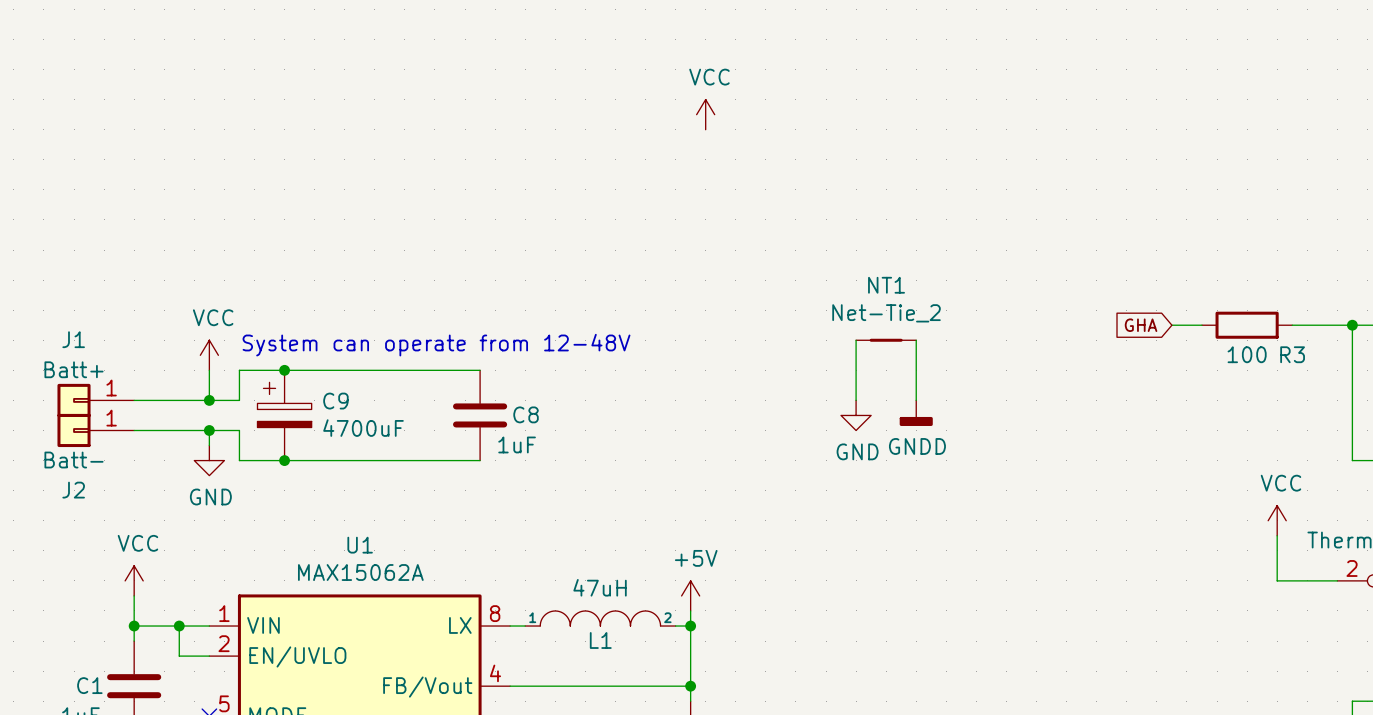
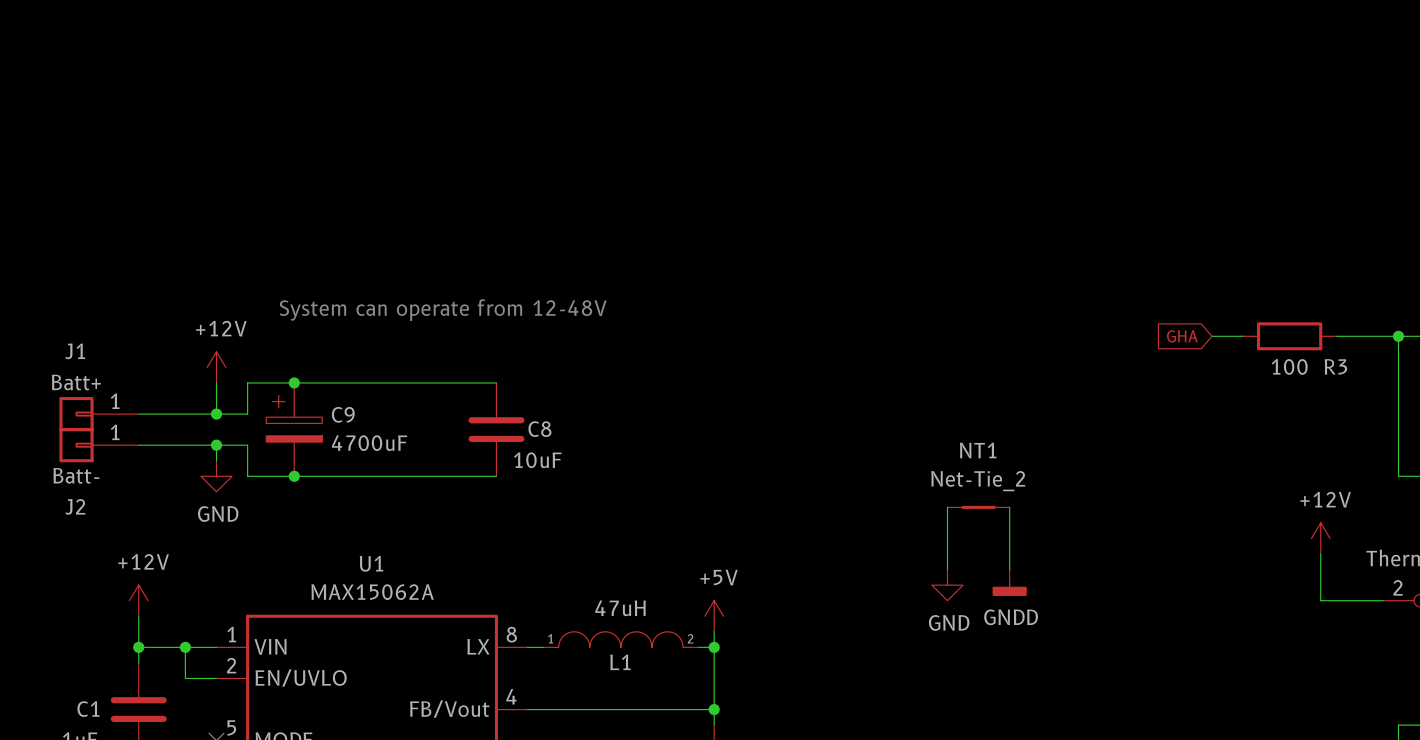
power symbol: VCC (705, 114) -> none
wire: (856, 340) (856, 400) -> (1009, 507) (1009, 569)
NT1 position: (886, 340) -> (978, 507)
wire: (916, 340) (916, 400) -> (947, 507) (947, 569)
text position: System can operate from 12-48V (436, 345) -> System can operate from 12-48V (443, 310)
power symbol: VCC (209, 355) -> +12V (216, 367)
power symbol position: GNDD (916, 413) -> GNDD (1009, 582)
power symbol position: GND (856, 415) -> GND (947, 585)
C8 value: 1uF (517, 444) -> 10uF (537, 460)
power symbol: VCC (1277, 520) -> +12V (1320, 538)
power symbol: VCC (134, 580) -> +12V (138, 600)

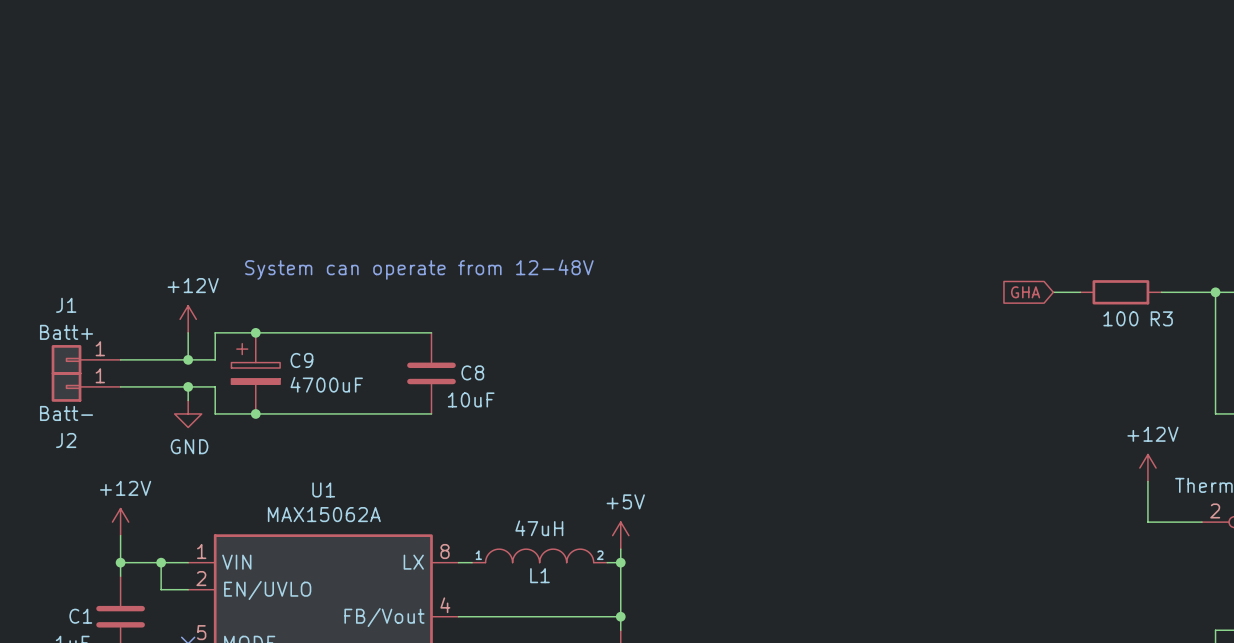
wire: (947, 507) (947, 569) -> none
NT1: Net-Tie_2 (978, 507) -> none
wire: (1009, 507) (1009, 569) -> none
power symbol: GNDD (1009, 582) -> none
power symbol: GND (947, 585) -> none

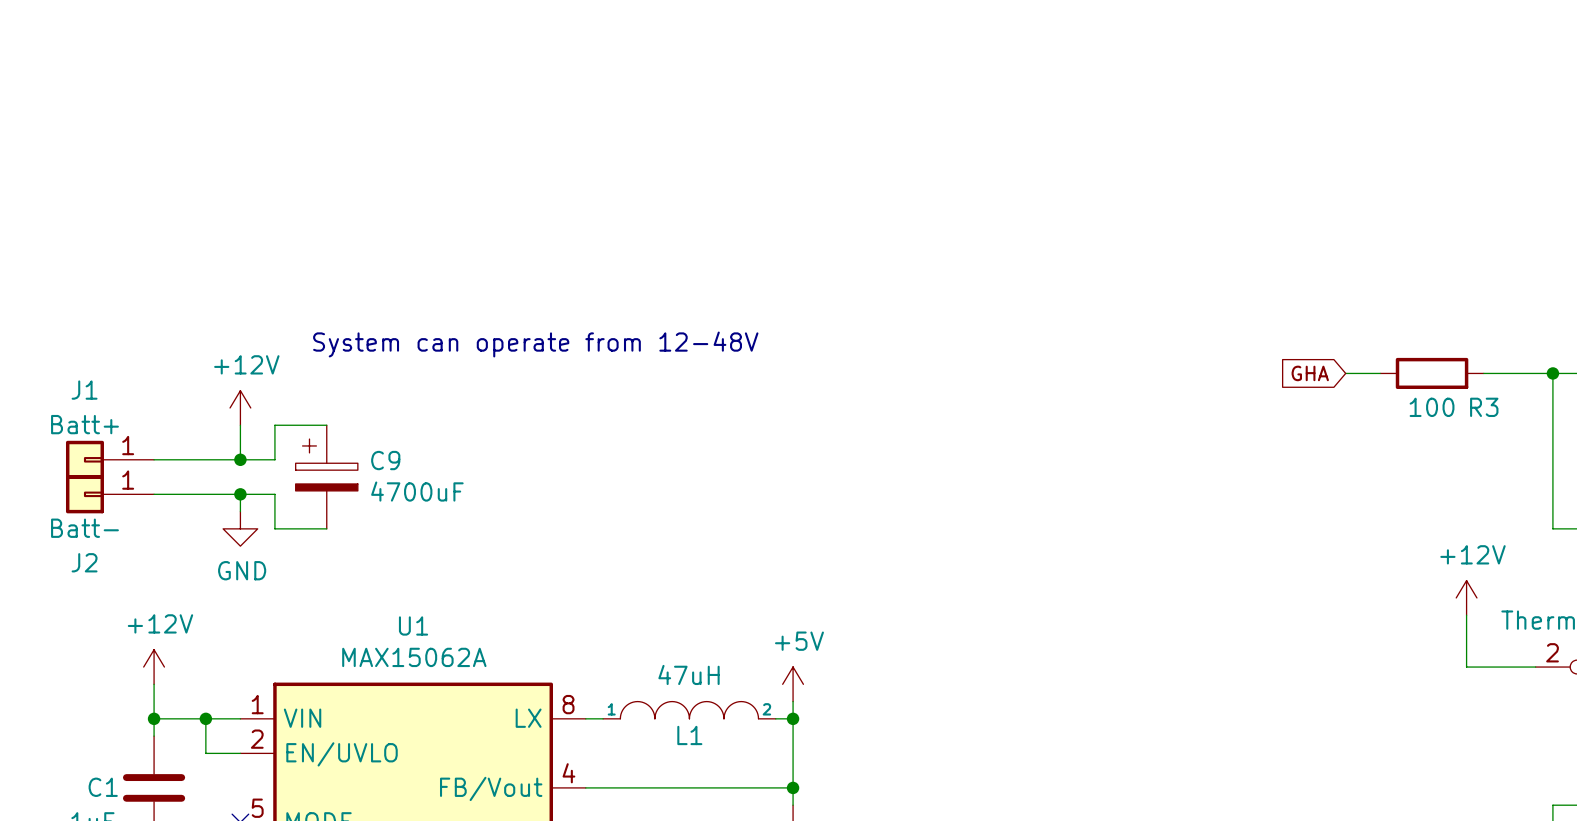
wire: (255, 332) (431, 332) -> none
junction: (255, 332) -> none
C8: 10uF (431, 373) -> none
wire: (255, 413) (431, 413) -> none
junction: (255, 413) -> none

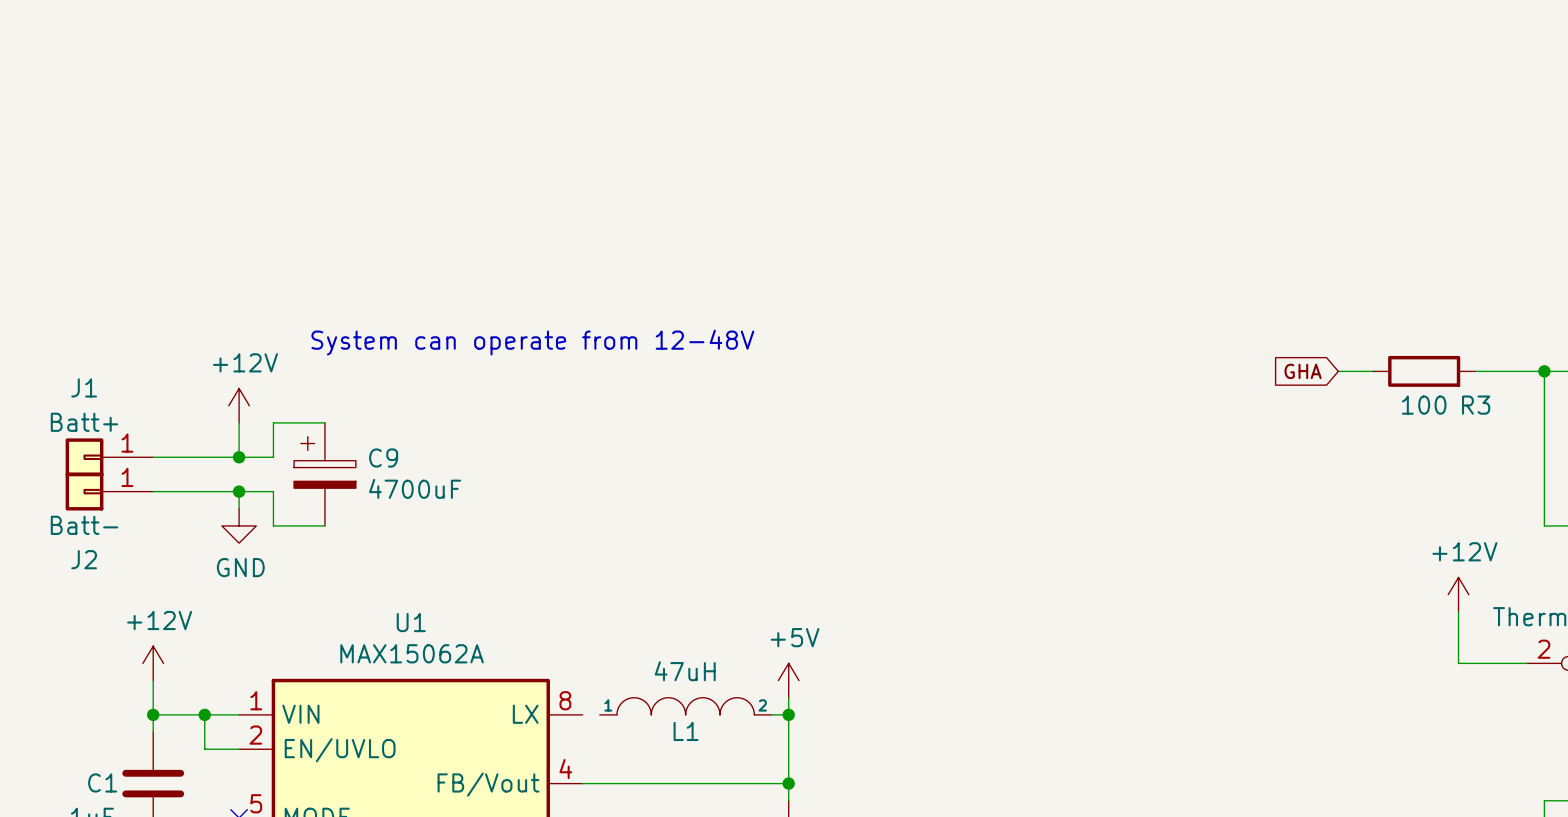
wire: (585, 718) (603, 718) -> none

